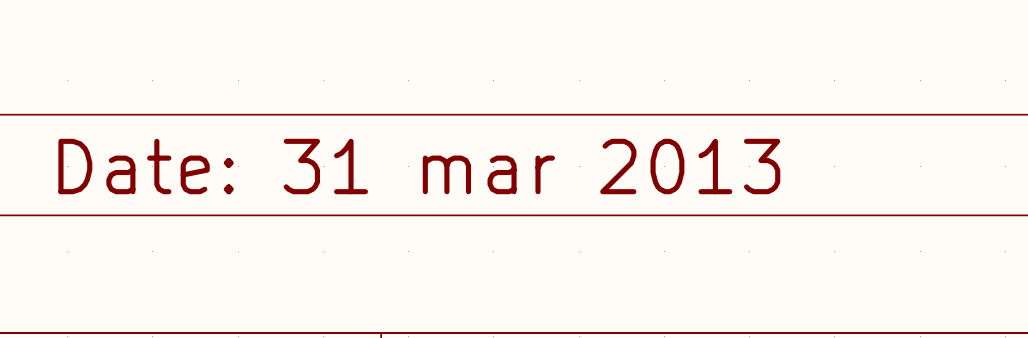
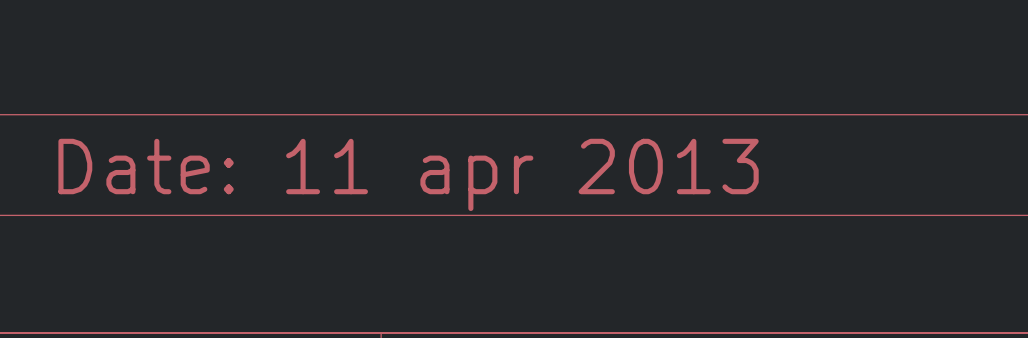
title block: Date: 31 mar 2013 (419, 166) -> Date: 11 apr 2013 (408, 174)

